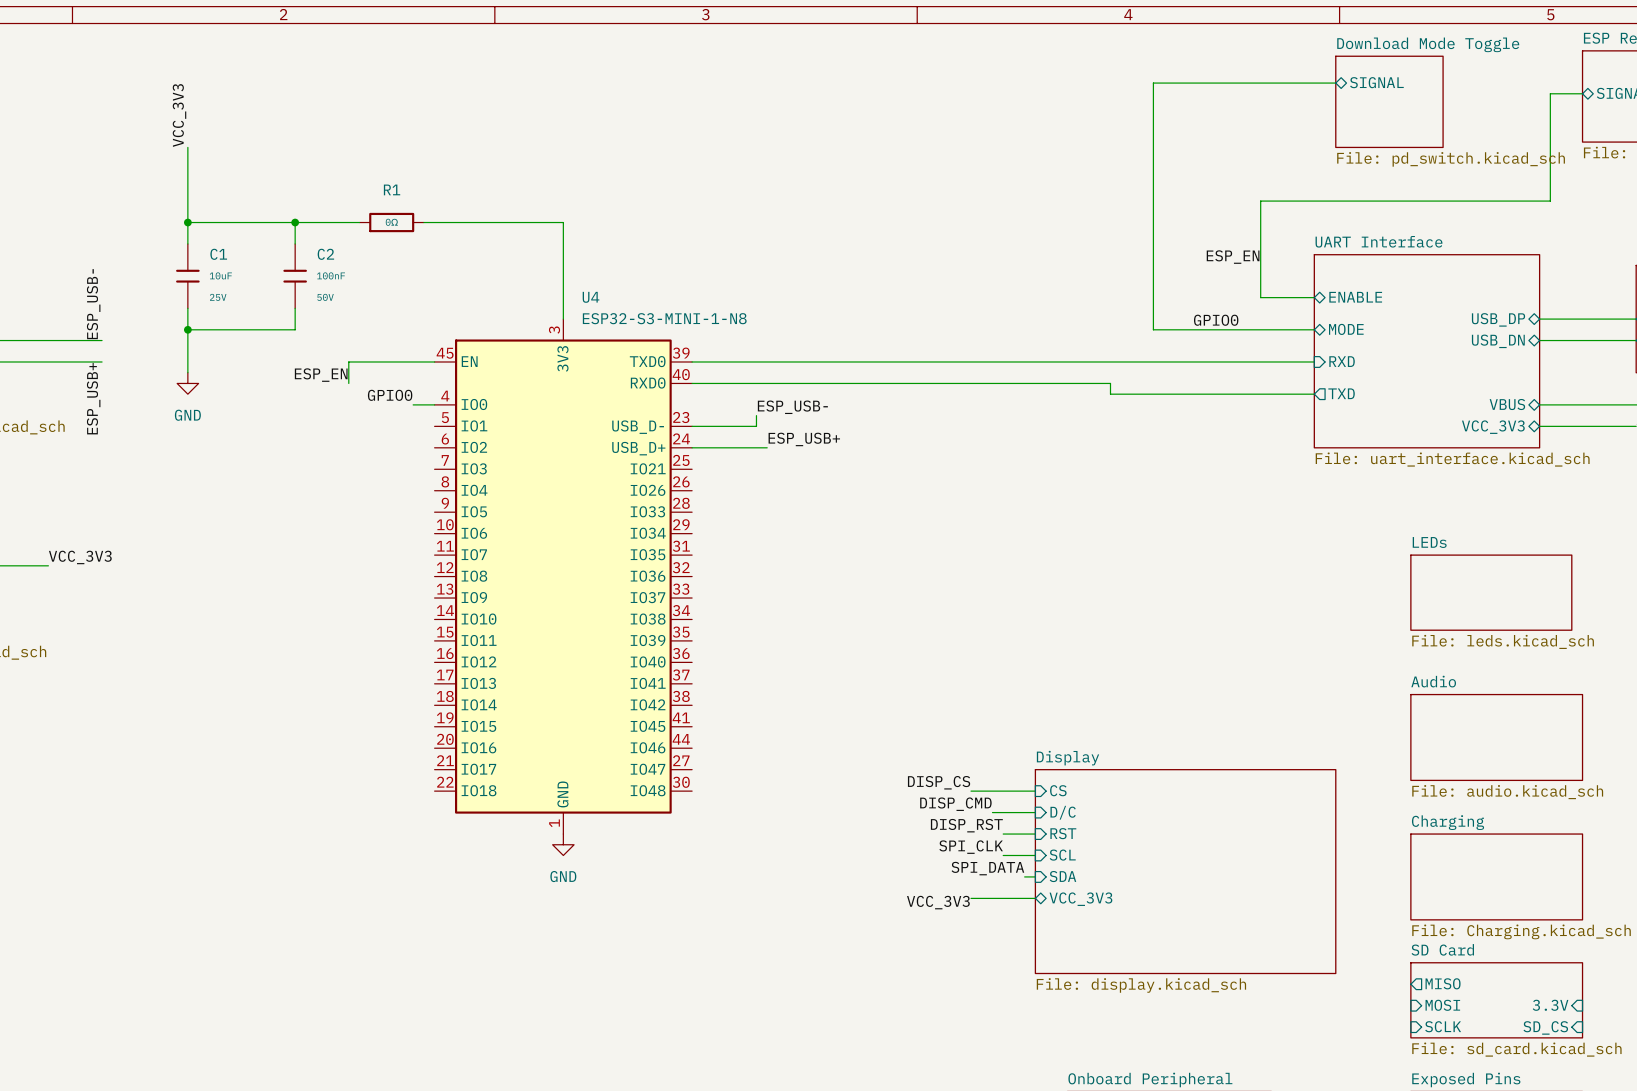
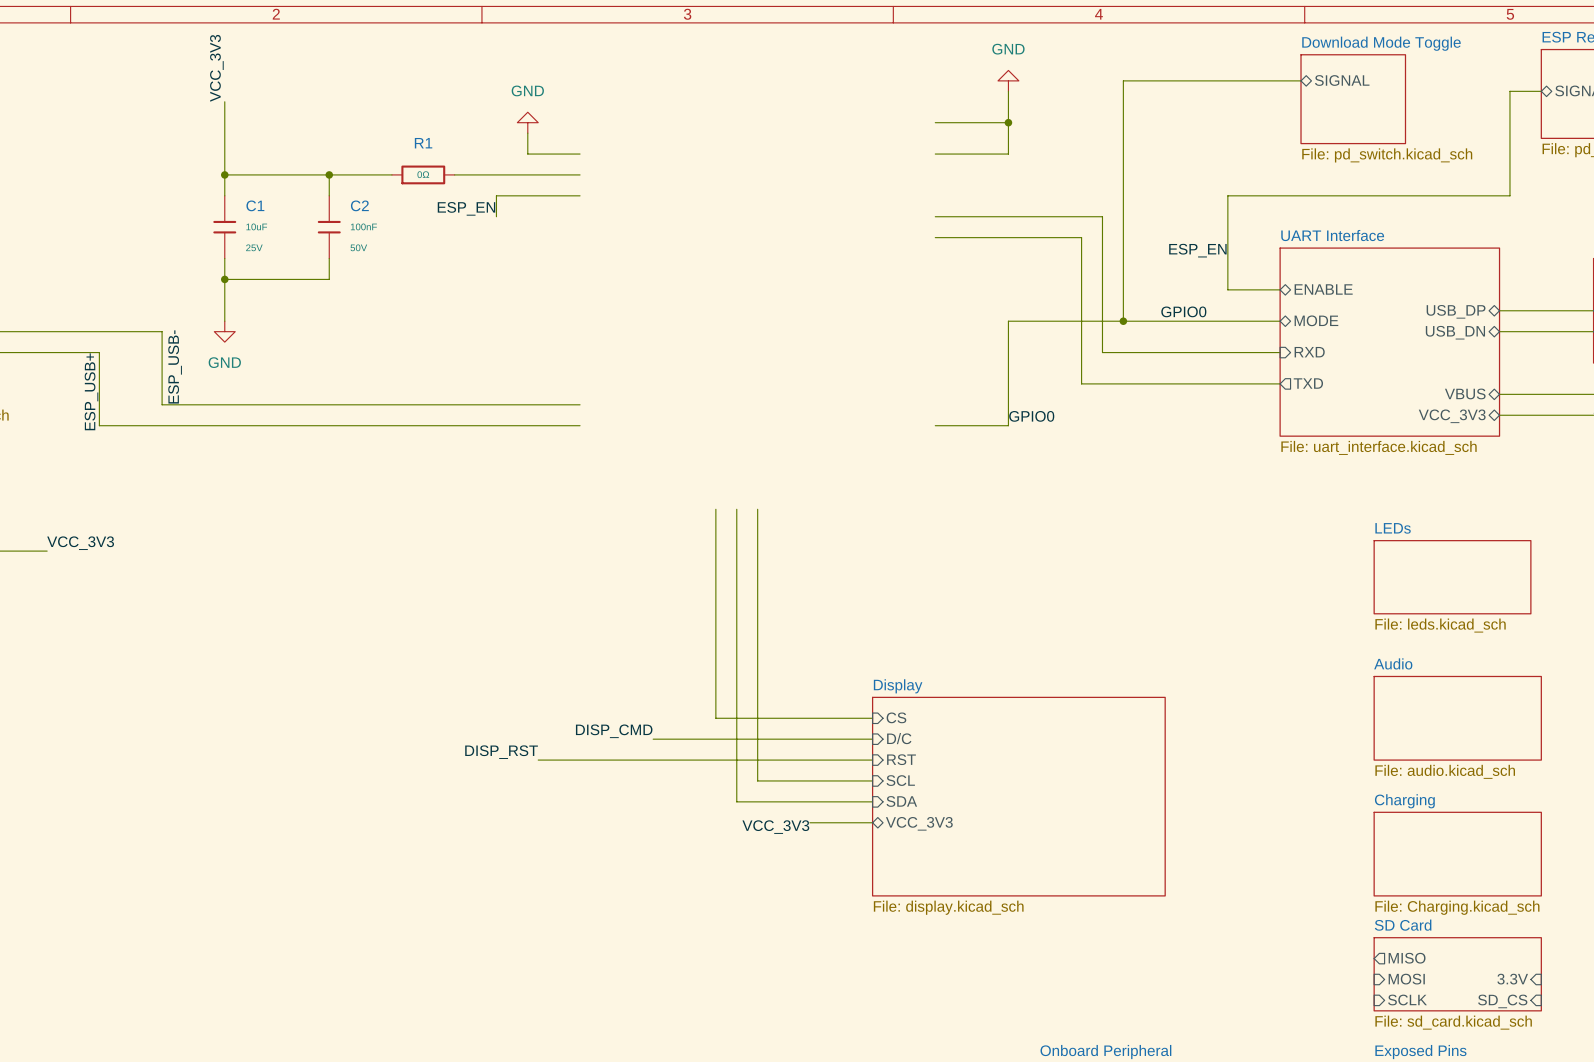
power symbol: none -> GND (1008, 80)
wire: none -> (1008, 91) (1008, 154) (935, 154)
label position: VCC_3V3 (179, 115) -> VCC_3V3 (216, 68)
power symbol: none -> GND (527, 122)
wire: none -> (935, 122) (1008, 122)
junction: none -> (1008, 122)
wire: none -> (527, 133) (527, 154) (580, 154)
wire: (187, 147) (187, 243) -> (224, 101) (224, 195)
junction: none -> (224, 174)
junction: none -> (329, 174)
wire: none -> (454, 174) (580, 174)
wire: none -> (580, 195) (496, 195) (496, 216)
label: none -> ESP_EN (466, 208)
wire: (187, 222) (359, 222) -> (224, 174) (391, 174)
junction: (187, 222) -> none
wire: (295, 222) (295, 243) -> (329, 174) (329, 195)
junction: (295, 222) -> none
R1 position: (391, 222) -> (423, 174)
wire: (423, 222) (563, 222) (563, 319) -> none
C1 position: (187, 276) -> (224, 227)
C2 position: (295, 276) -> (329, 227)
junction: none -> (224, 279)
label position: ESP_USB- (93, 304) -> ESP_USB- (175, 366)
wire: (187, 308) (187, 372) -> (224, 258) (224, 321)
wire: (295, 308) (295, 329) (187, 329) -> (329, 258) (329, 279) (224, 279)
junction: (187, 329) -> none
wire: none -> (1123, 321) (1008, 321) (1008, 425) (935, 425)
junction: none -> (1123, 321)
wire: none -> (99, 331) (162, 331) (162, 404) (580, 404)
wire: none -> (99, 352) (99, 425) (580, 425)
wire: (434, 361) (348, 361) (348, 383) -> none
wire: (692, 361) (1131, 361) -> (935, 216) (1102, 216) (1102, 352)
label: ESP_EN (321, 375) -> none
power symbol position: GND (187, 383) -> GND (224, 331)
wire: (692, 383) (1110, 383) -> (935, 237) (1081, 237) (1081, 373)
label: GPIO0 (390, 395) -> none
wire: (413, 404) (434, 404) -> none
label: ESP_USB- (792, 407) -> none
wire: (756, 415) (756, 426) (692, 426) -> none
label: none -> GPIO0 (1031, 416)
label: ESP_USB+ (804, 439) -> none
wire: (692, 447) (767, 447) -> none
wire: none -> (715, 509) (715, 718) (872, 718)
wire: none -> (736, 509) (736, 801) (872, 801)
wire: none -> (757, 509) (757, 780) (872, 780)
U4: ESP32-S3-MINI-1-N8 (563, 576) -> none
label: none -> DISP_CMD (614, 731)
wire: none -> (653, 739) (872, 739)
label: none -> DISP_RST (501, 752)
wire: none -> (538, 760) (872, 760)
label: DISP_CS (939, 782) -> none
sheet pin position: CS (1058, 790) -> CS (896, 717)
wire: (971, 791) (1035, 791) -> (809, 822) (872, 822)
label: DISP_CMD (955, 804) -> none
wire: (992, 812) (1035, 812) -> none
sheet pin position: D/C (1063, 812) -> D/C (899, 738)
label: DISP_RST (966, 825) -> none
sheet pin position: RST (1063, 833) -> RST (901, 759)
wire: (1003, 834) (1035, 834) -> none
power symbol: GND (563, 844) -> none
label: SPI_CLK (971, 847) -> none
wire: (1003, 855) (1035, 855) -> none
sheet pin position: SCL (1062, 855) -> SCL (900, 780)
label: SPI_DATA (987, 868) -> none
sheet Display position: (1185, 871) -> (1018, 796)
wire: (1024, 876) (1035, 876) -> none
sheet pin position: SDA (1062, 876) -> SDA (901, 801)
wire: (971, 898) (1035, 898) -> none
sheet pin position: VCC_3V3 (1080, 899) -> VCC_3V3 (919, 823)
label position: VCC_3V3 (938, 902) -> VCC_3V3 (775, 827)

